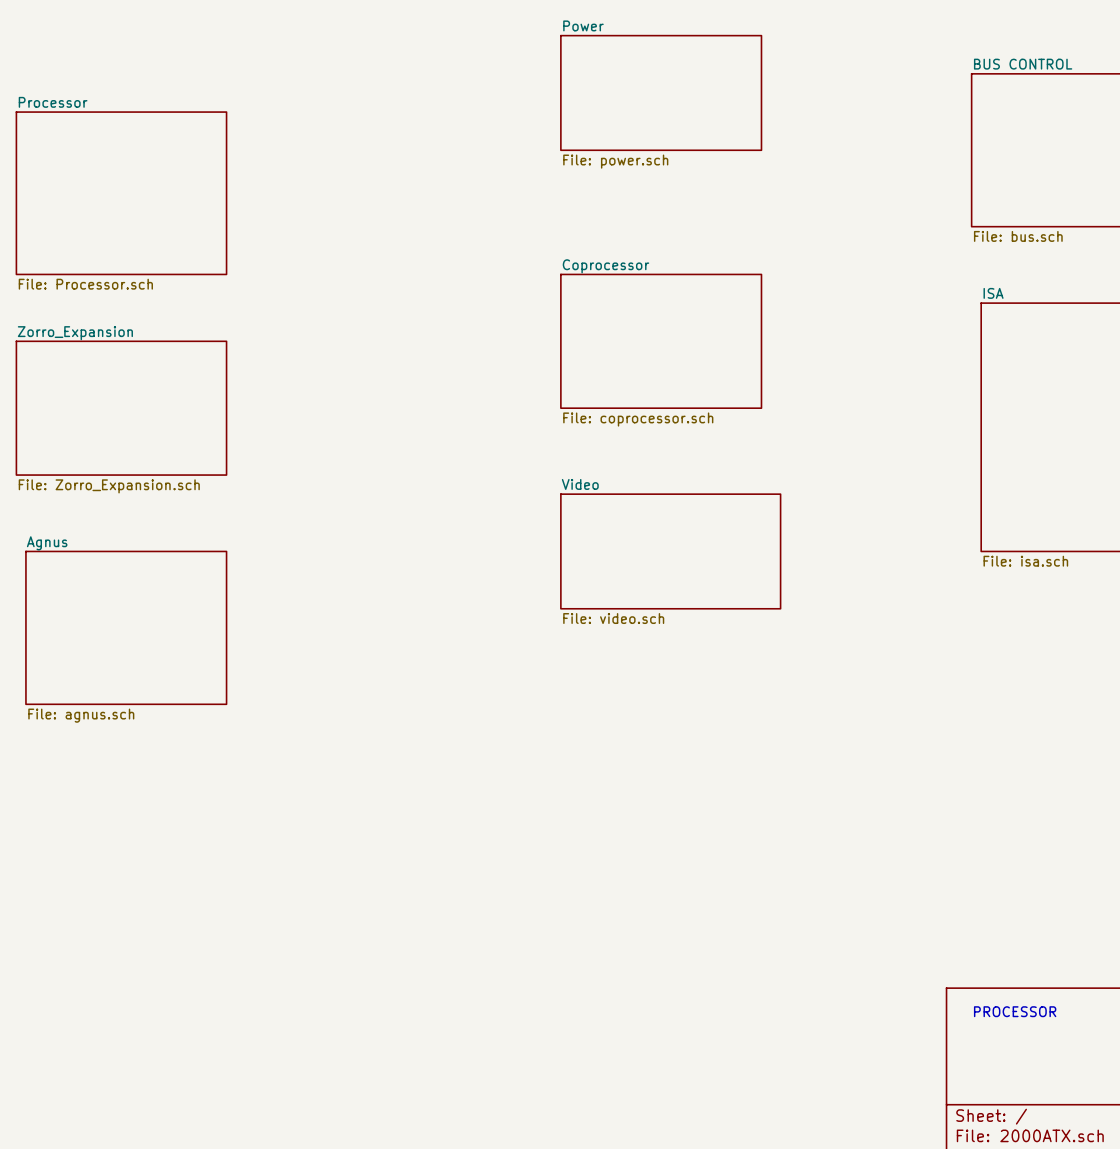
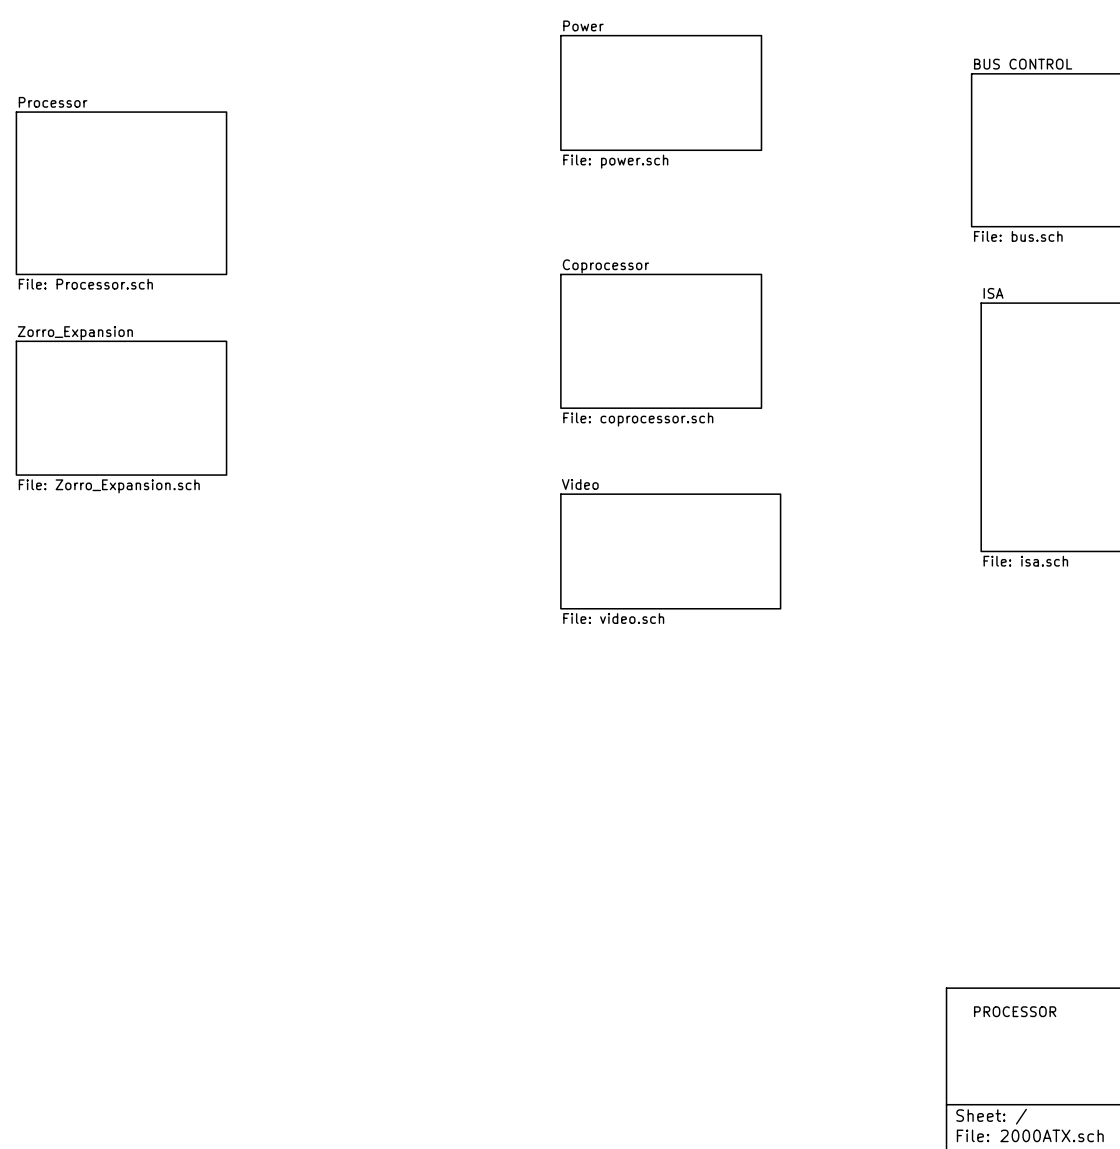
sheet Agnus: File: agnus.sch (126, 627) -> none

